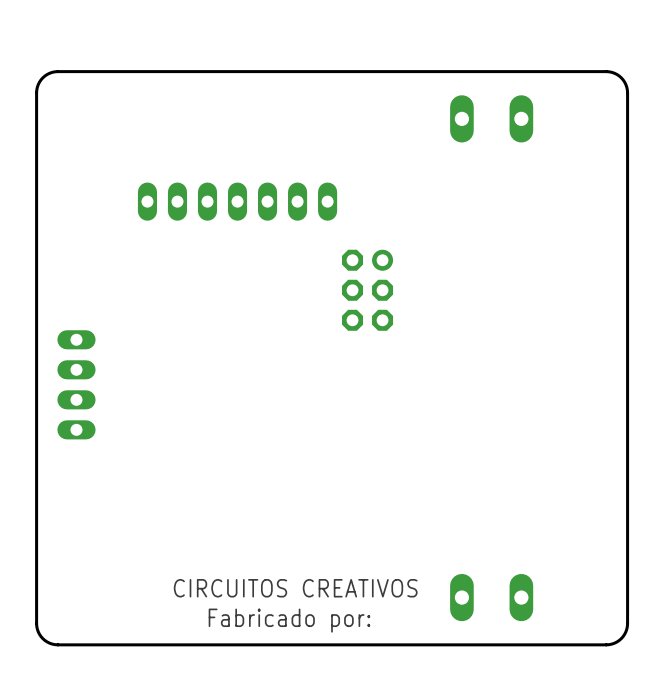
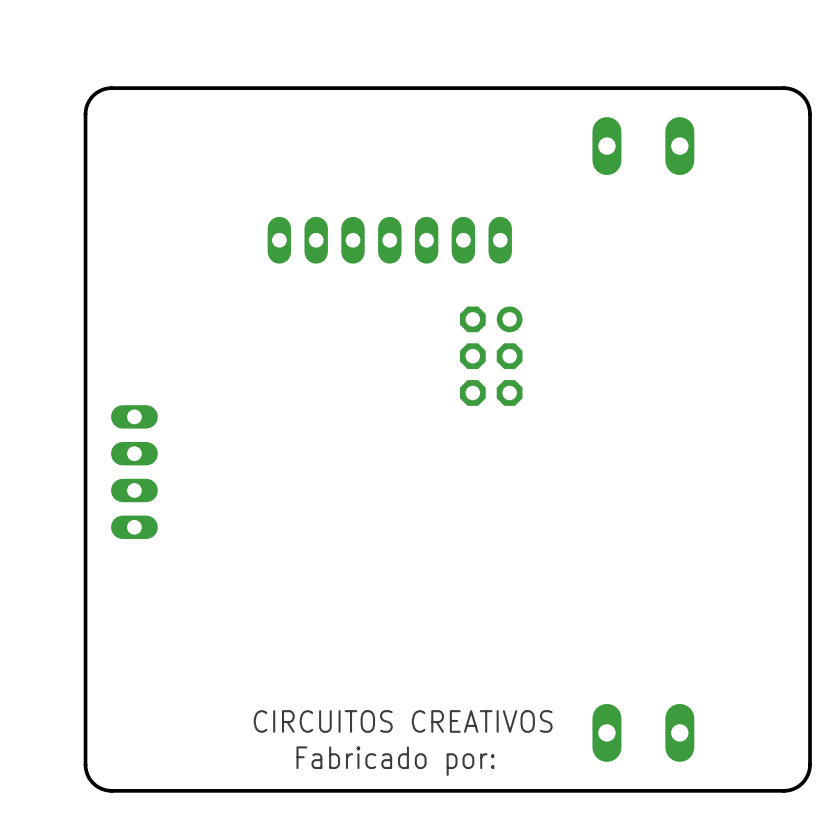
part position: (237, 201) -> (389, 240)

